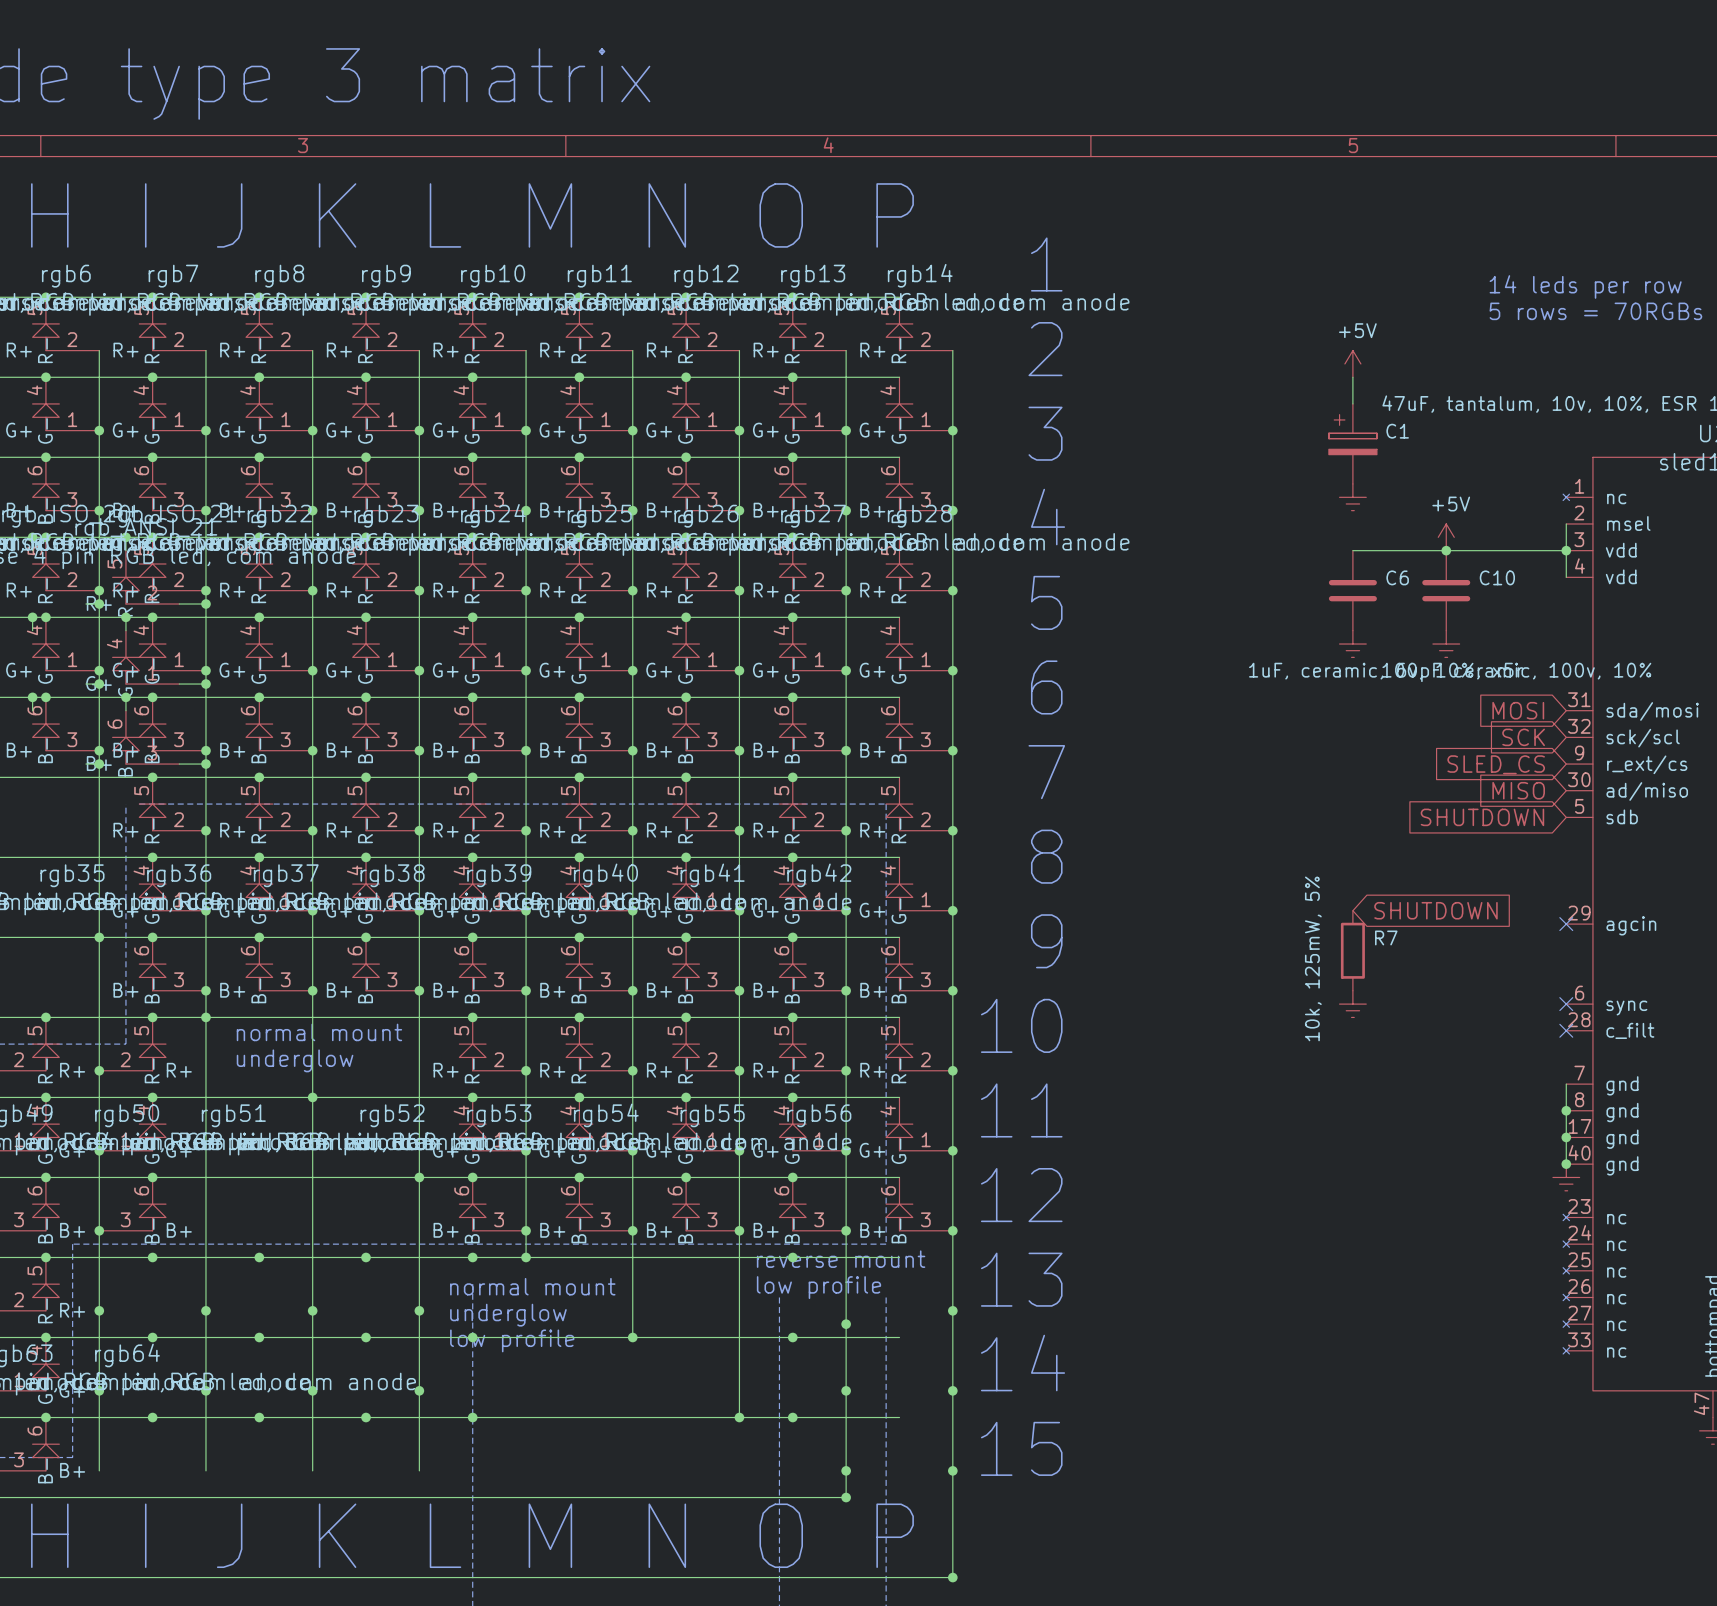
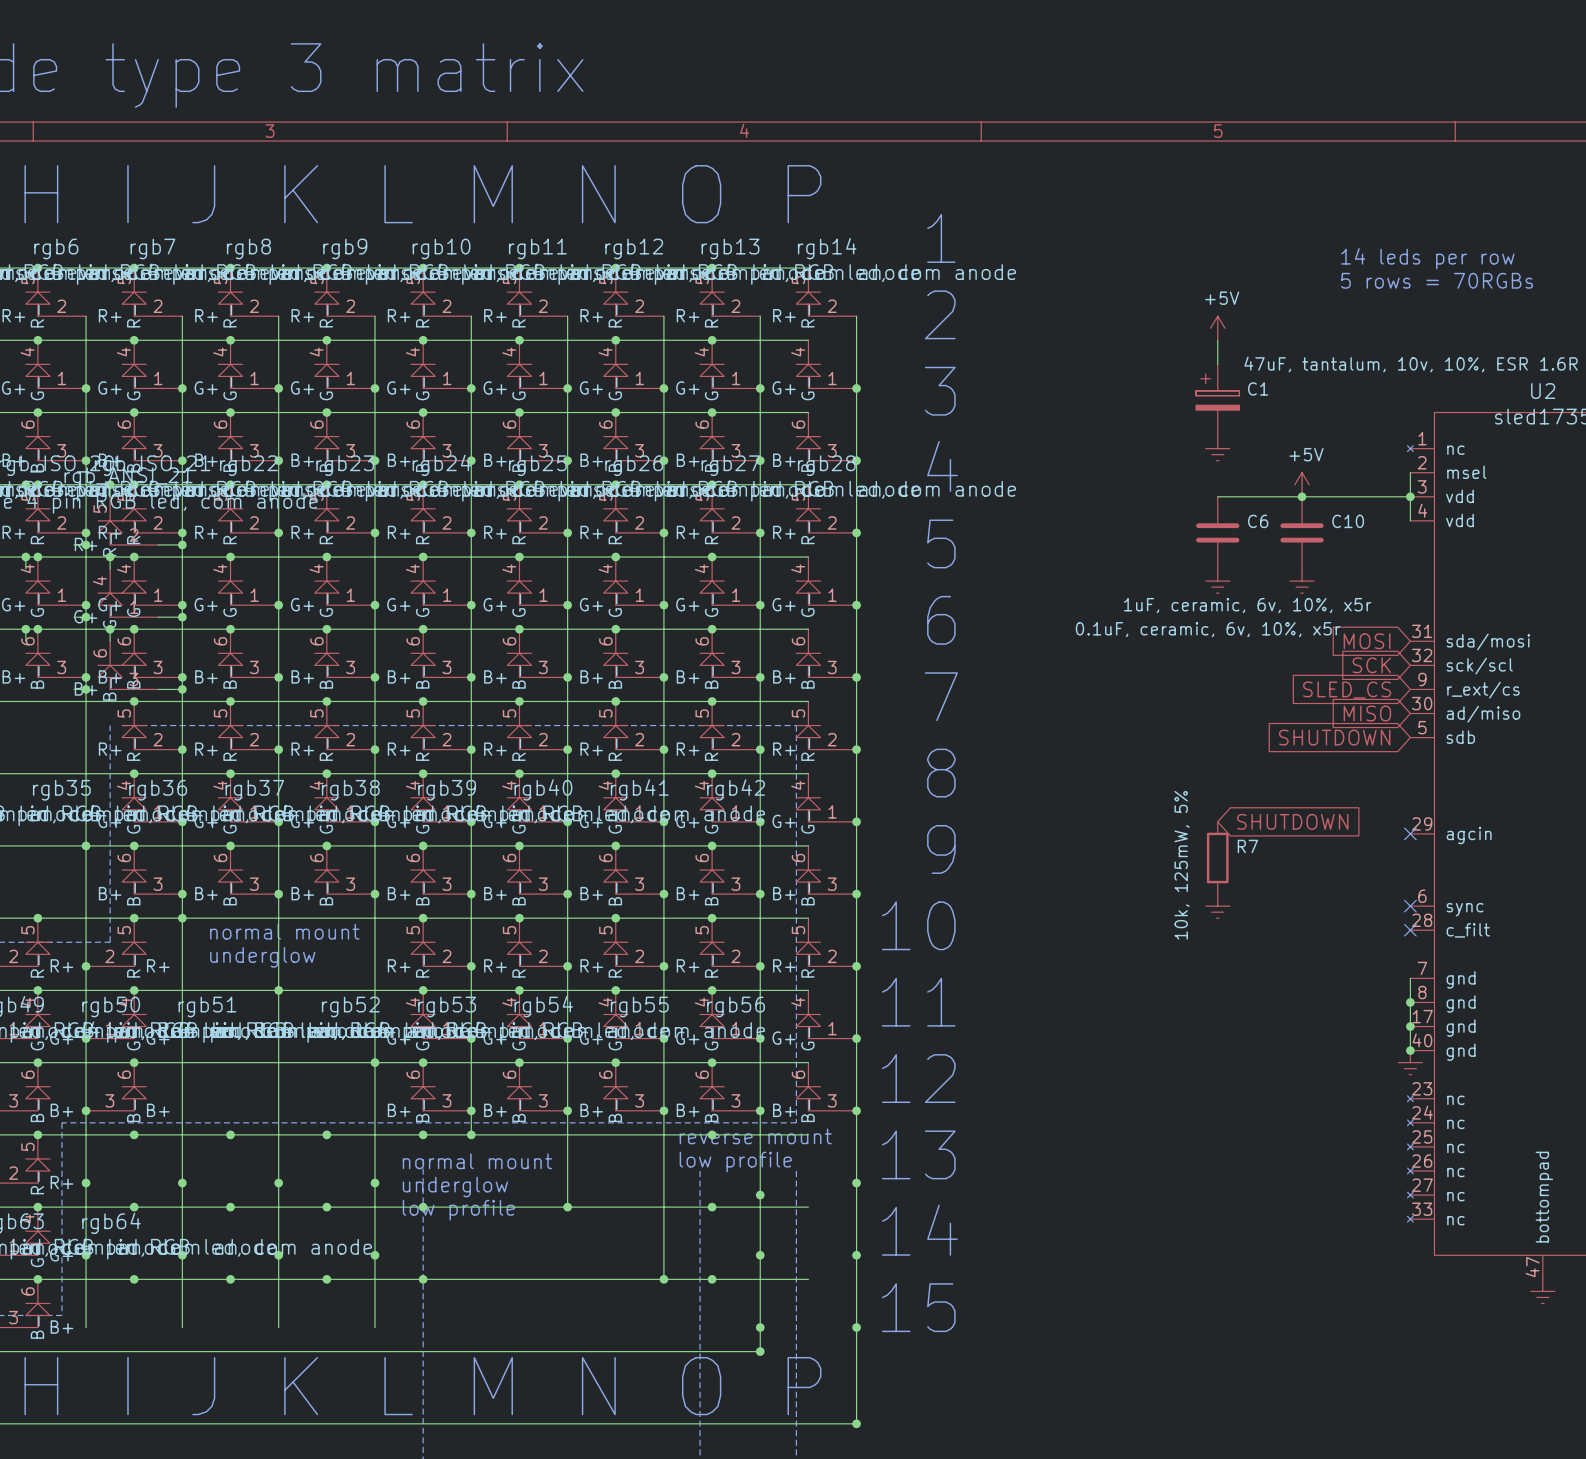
C10 value: 100pF ceramic, 100v, 10% (1516, 672) -> 0.1uF, ceramic, 6v, 10%, x5r (1208, 629)

